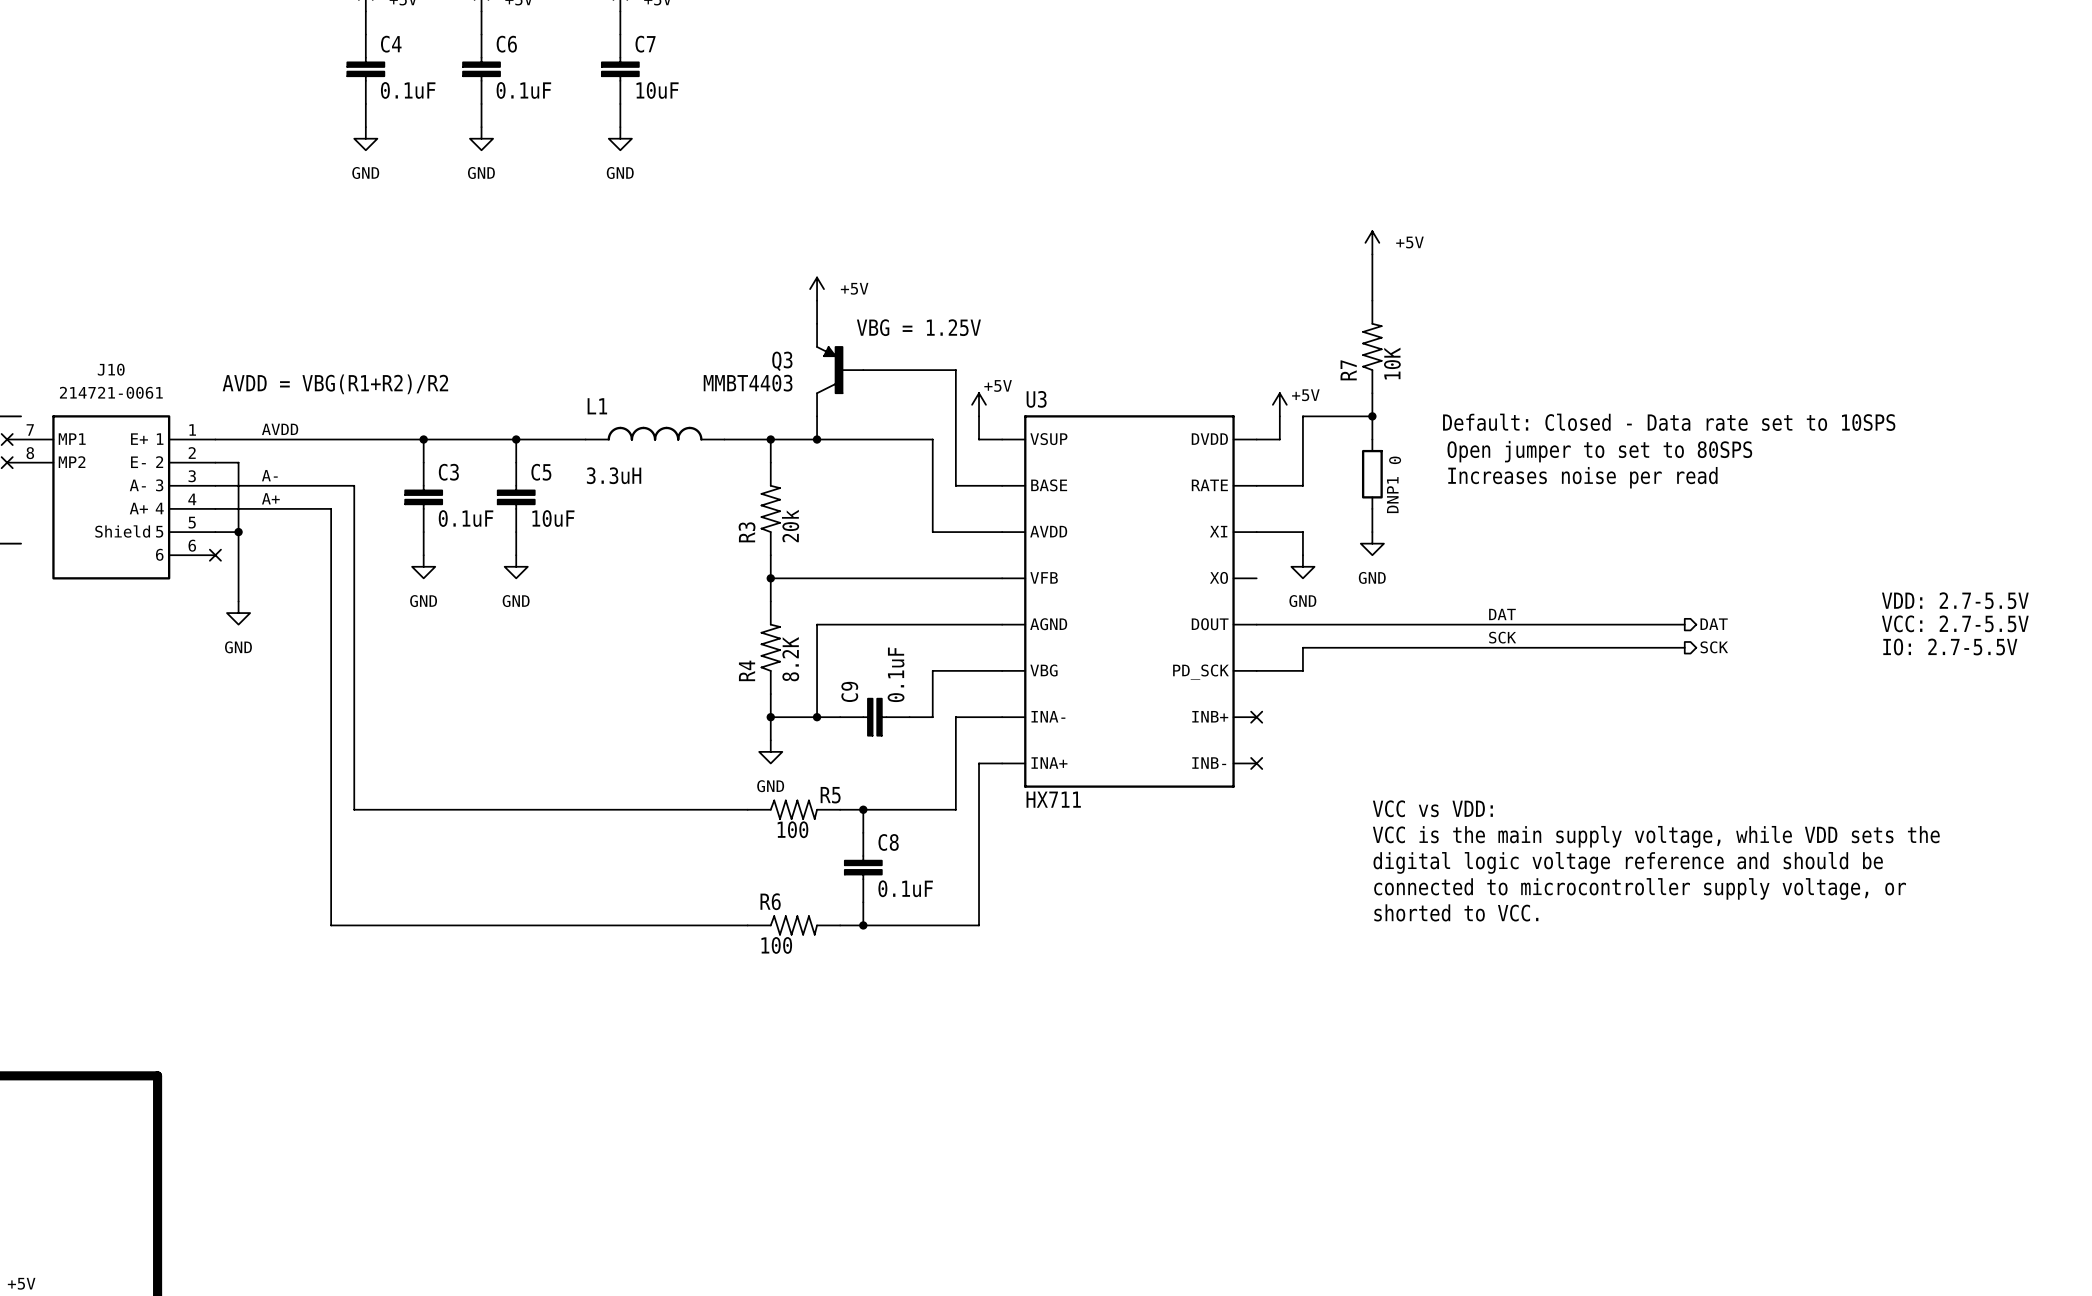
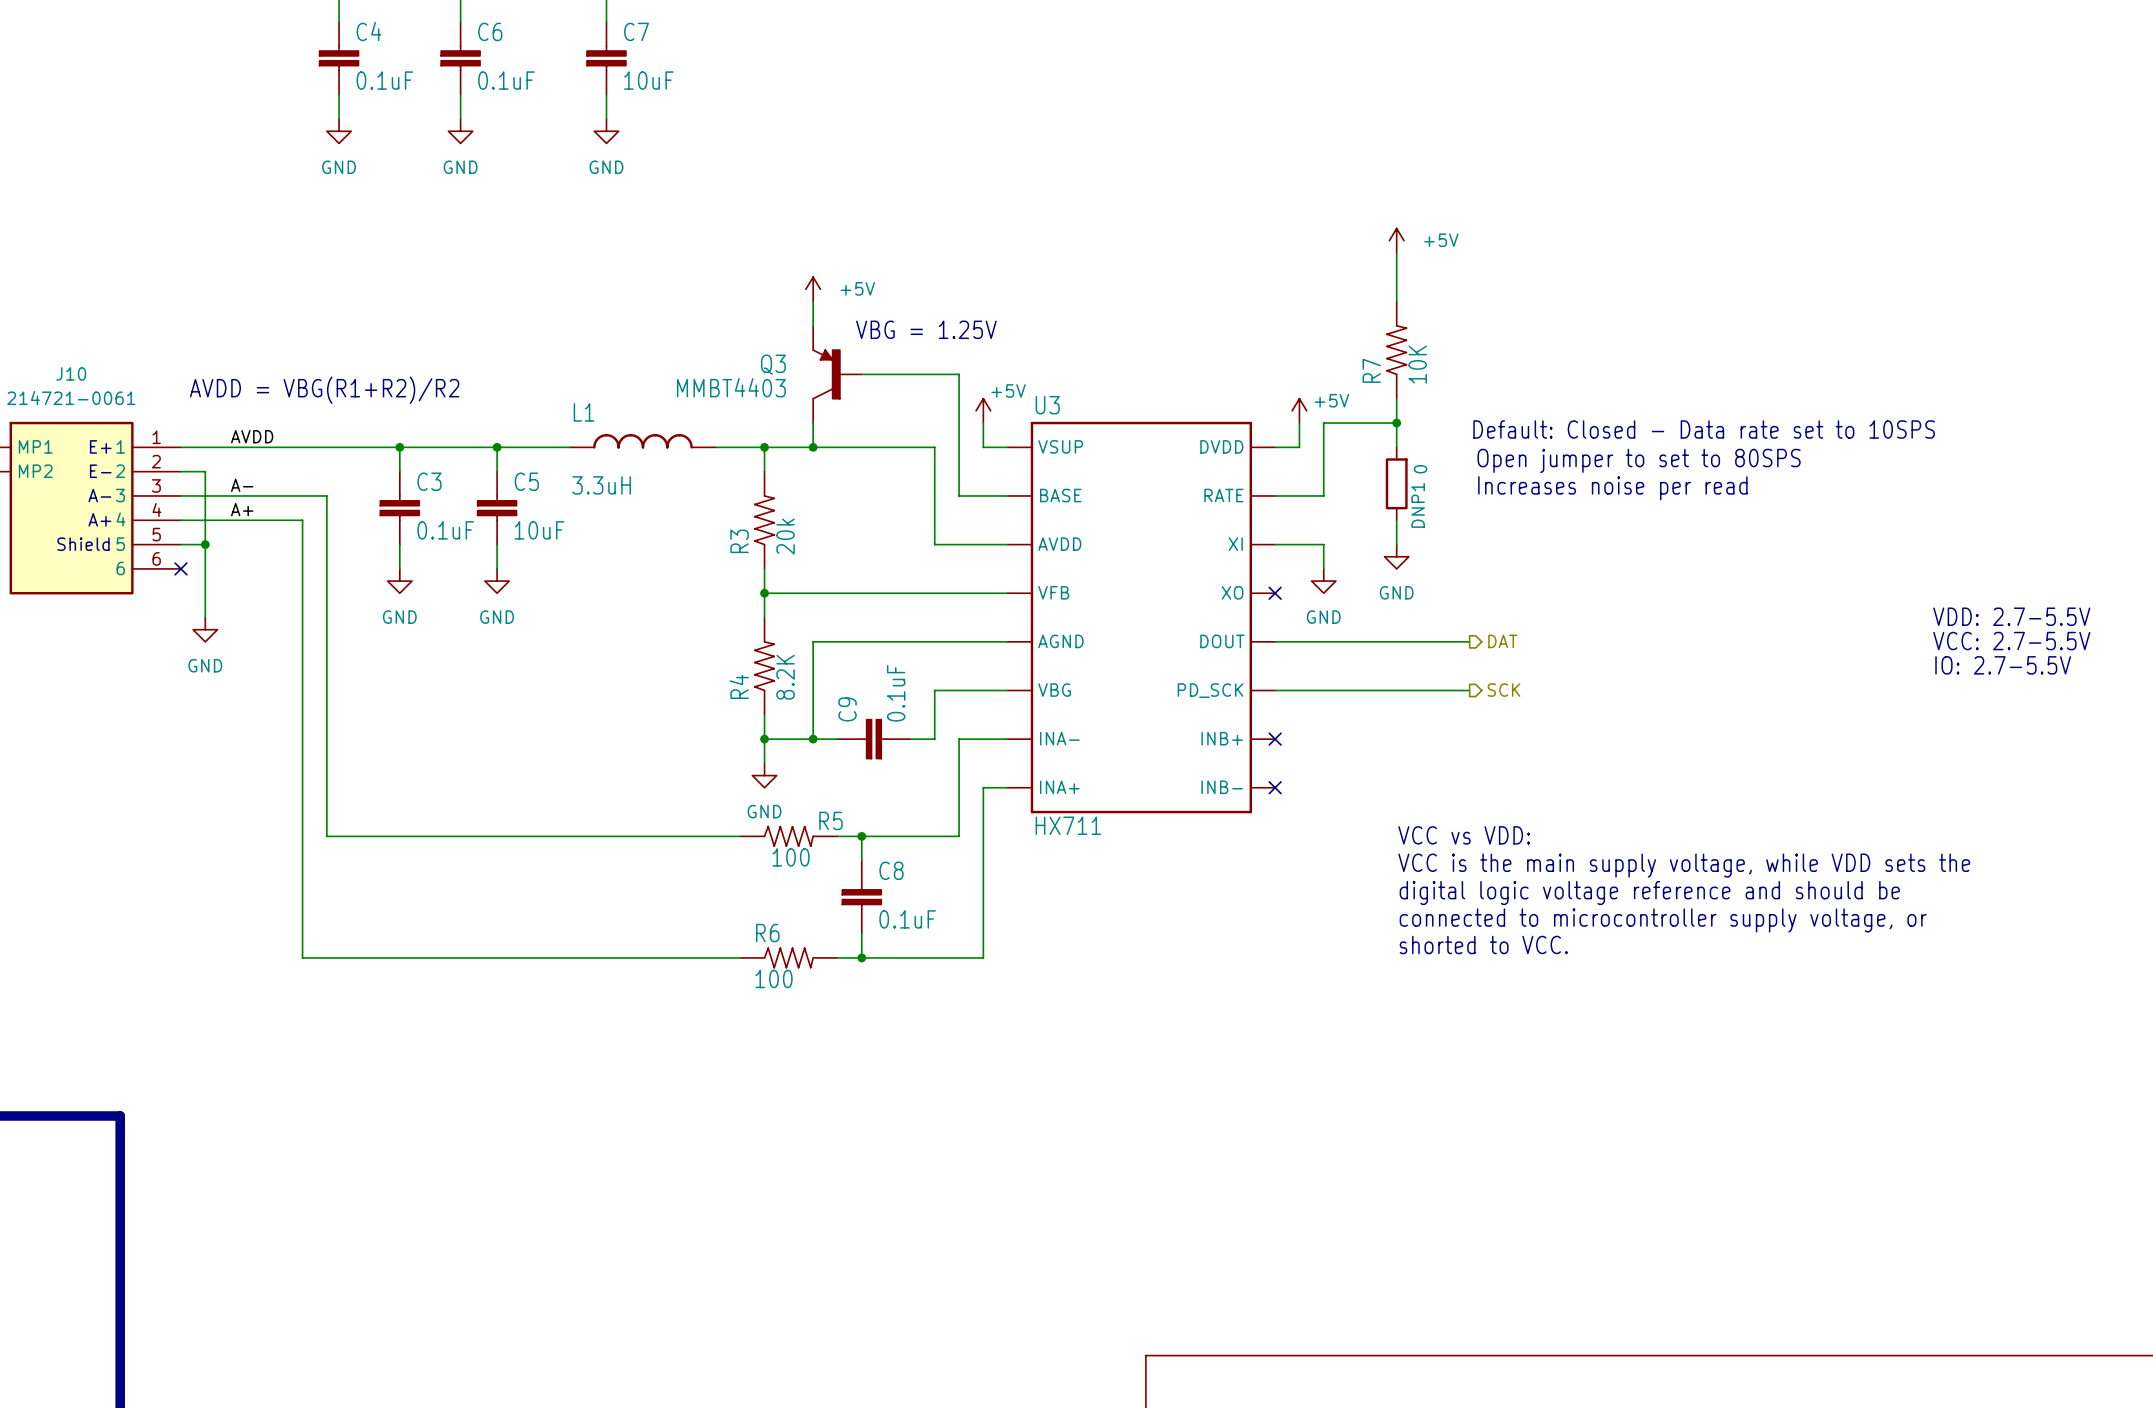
no-connect mark: none -> (1275, 593)
label: DAT (1502, 614) -> none
wire: (1441, 624) (1684, 624) -> none
hierarchical label: none -> DAT (1502, 641)
hierarchical label: DAT (1714, 624) -> none
label: SCK (1502, 637) -> none
wire: (1684, 647) (1302, 647) (1302, 670) -> (1469, 690) (1323, 690)
hierarchical label: SCK (1714, 647) -> none
hierarchical label: none -> SCK (1503, 690)

